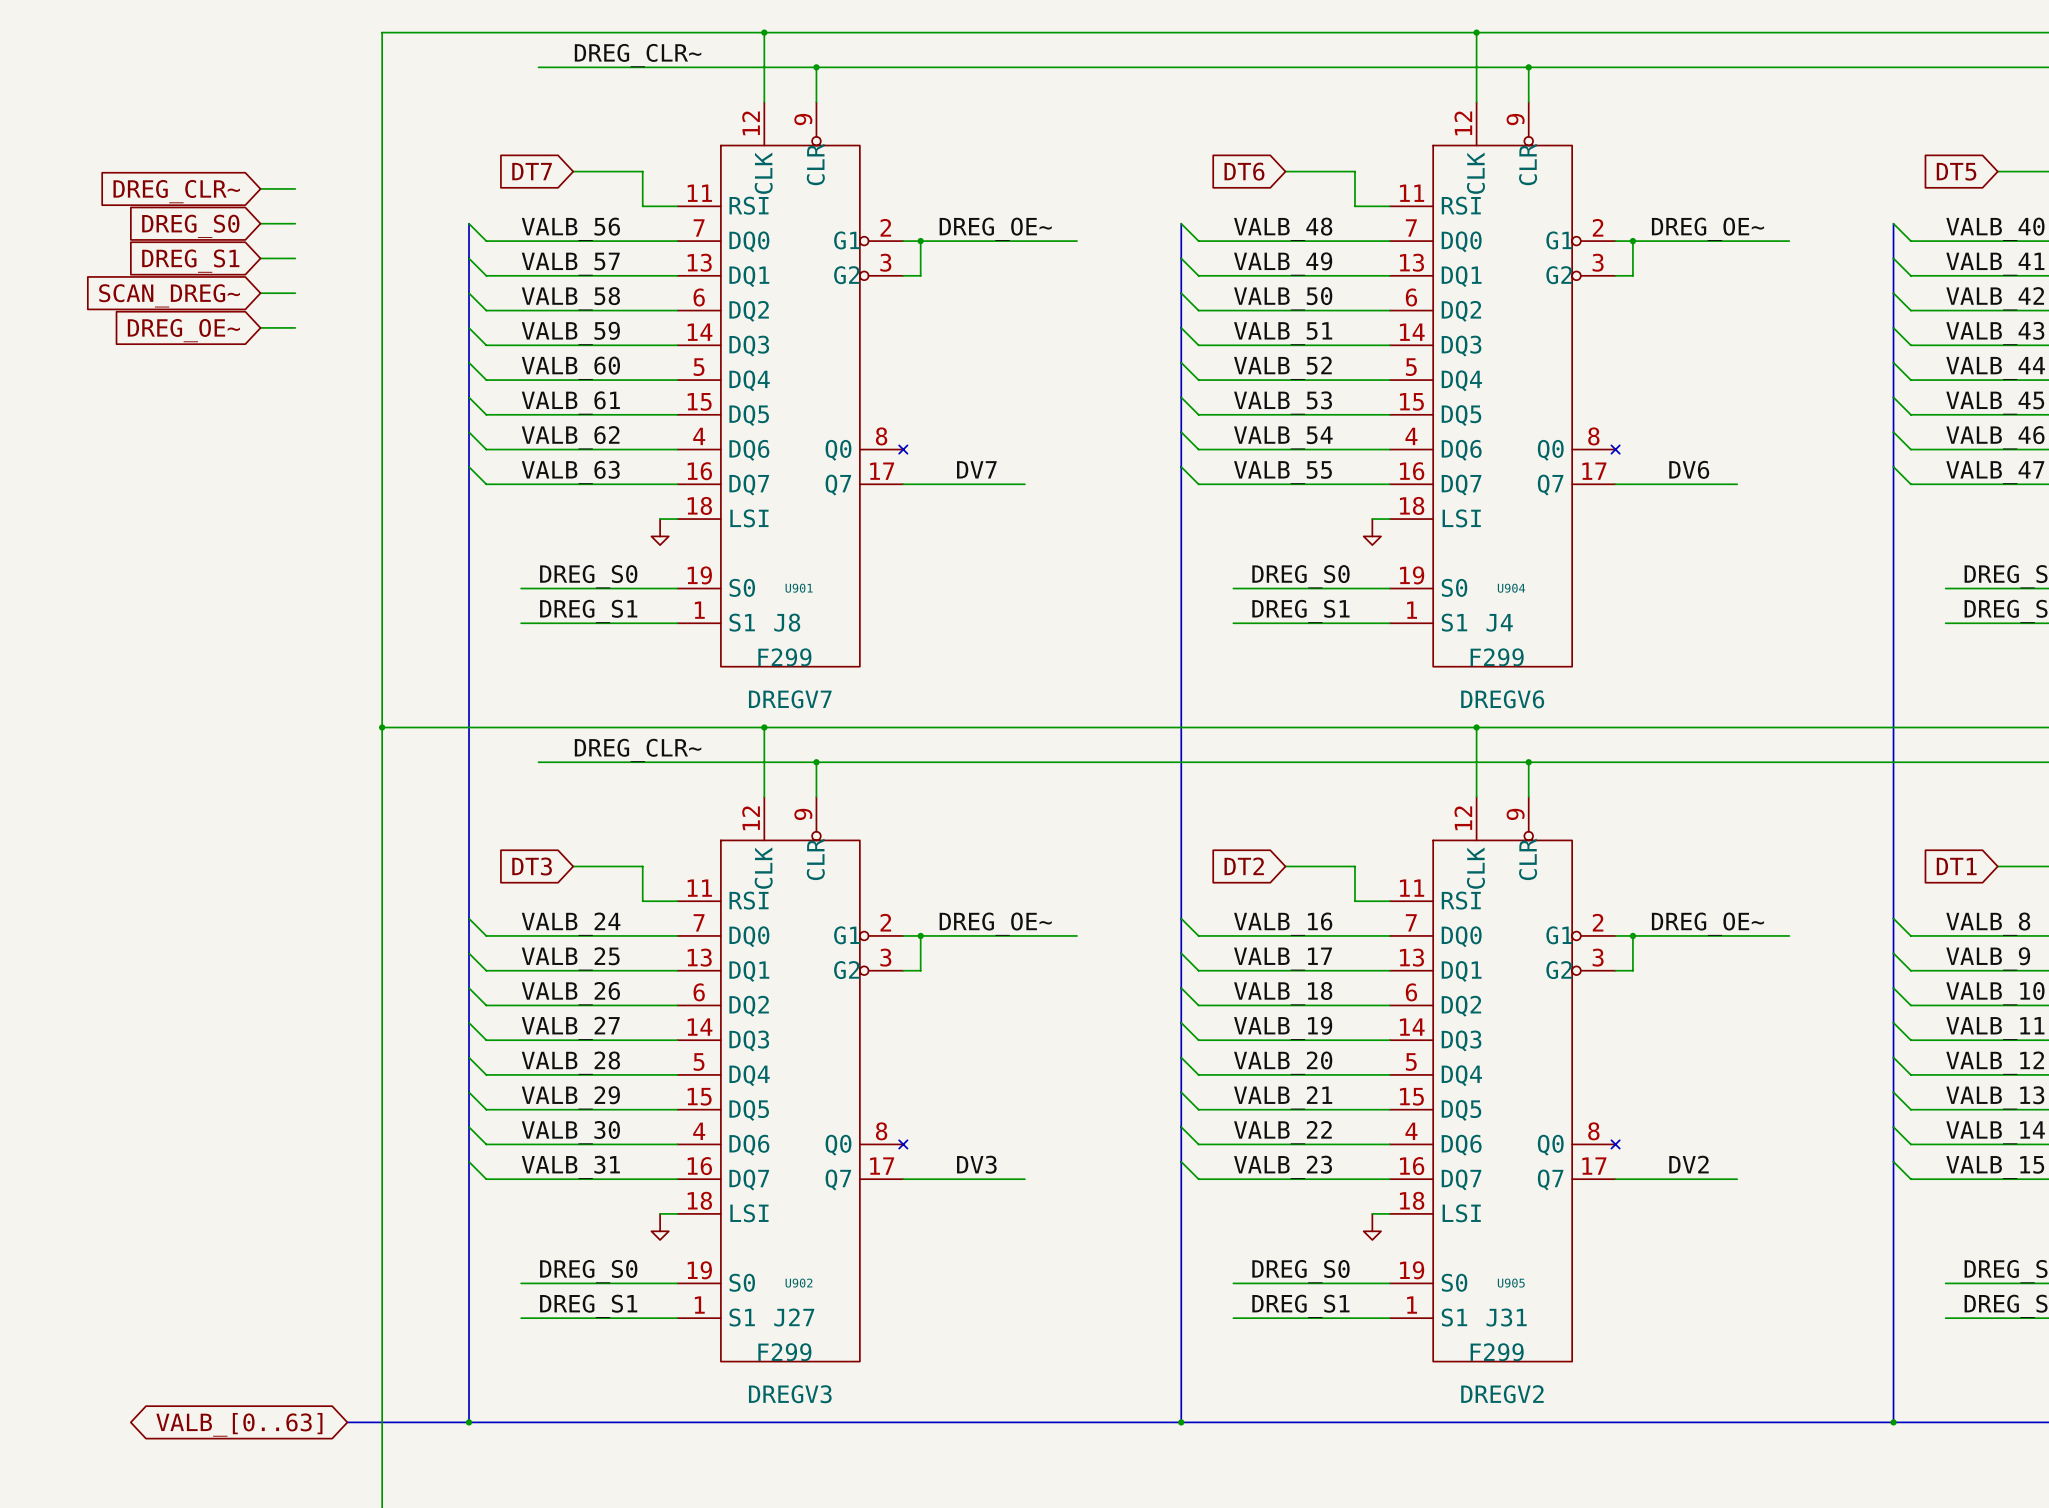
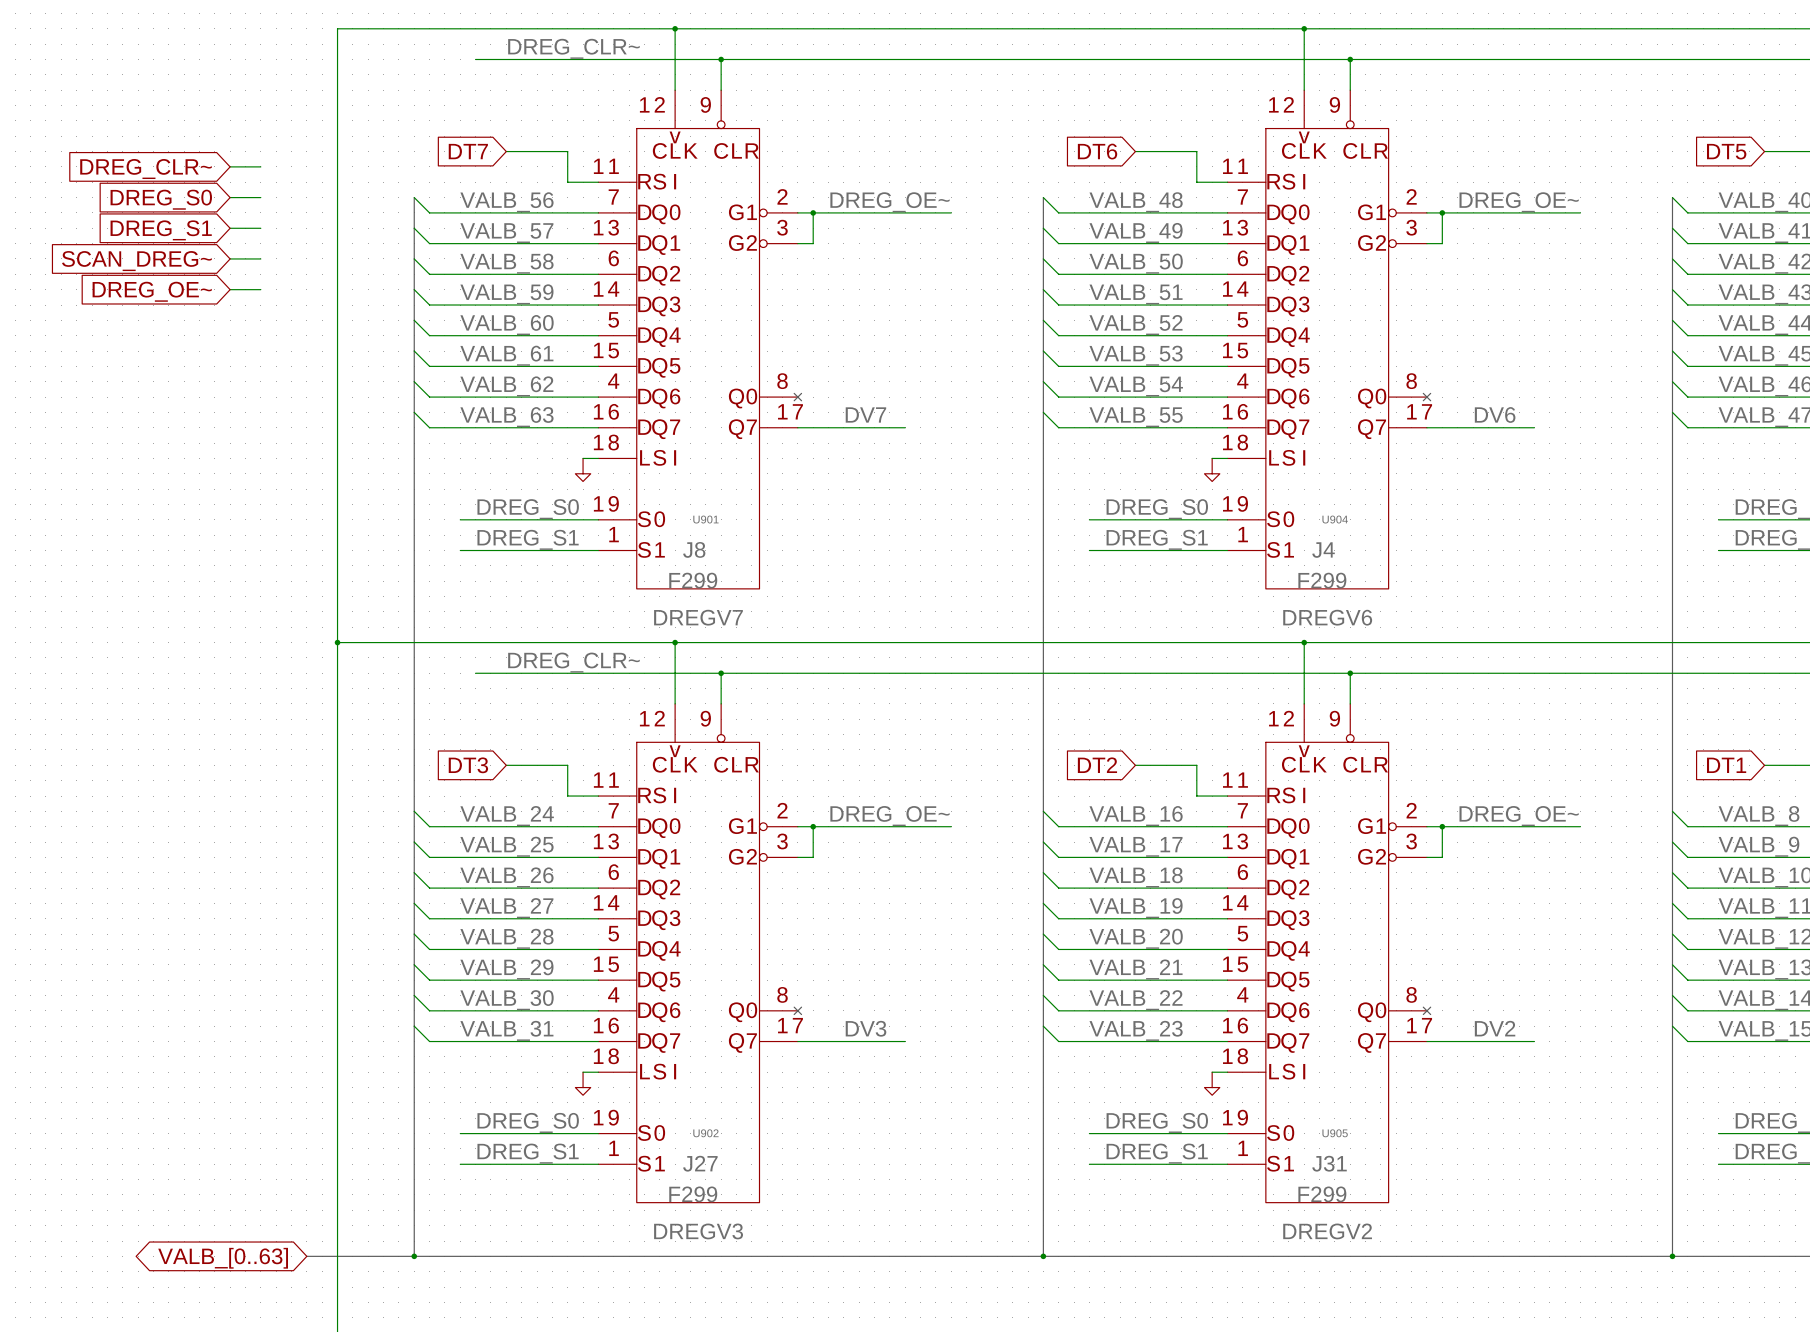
U901 symbol: [677, 102, 904, 667] -> [598, 90, 798, 589]
U904 symbol: [1389, 102, 1616, 667] -> [1227, 90, 1427, 589]
U902 symbol: [677, 796, 904, 1362] -> [598, 703, 798, 1203]
U905 symbol: [1389, 796, 1616, 1362] -> [1227, 703, 1427, 1203]

